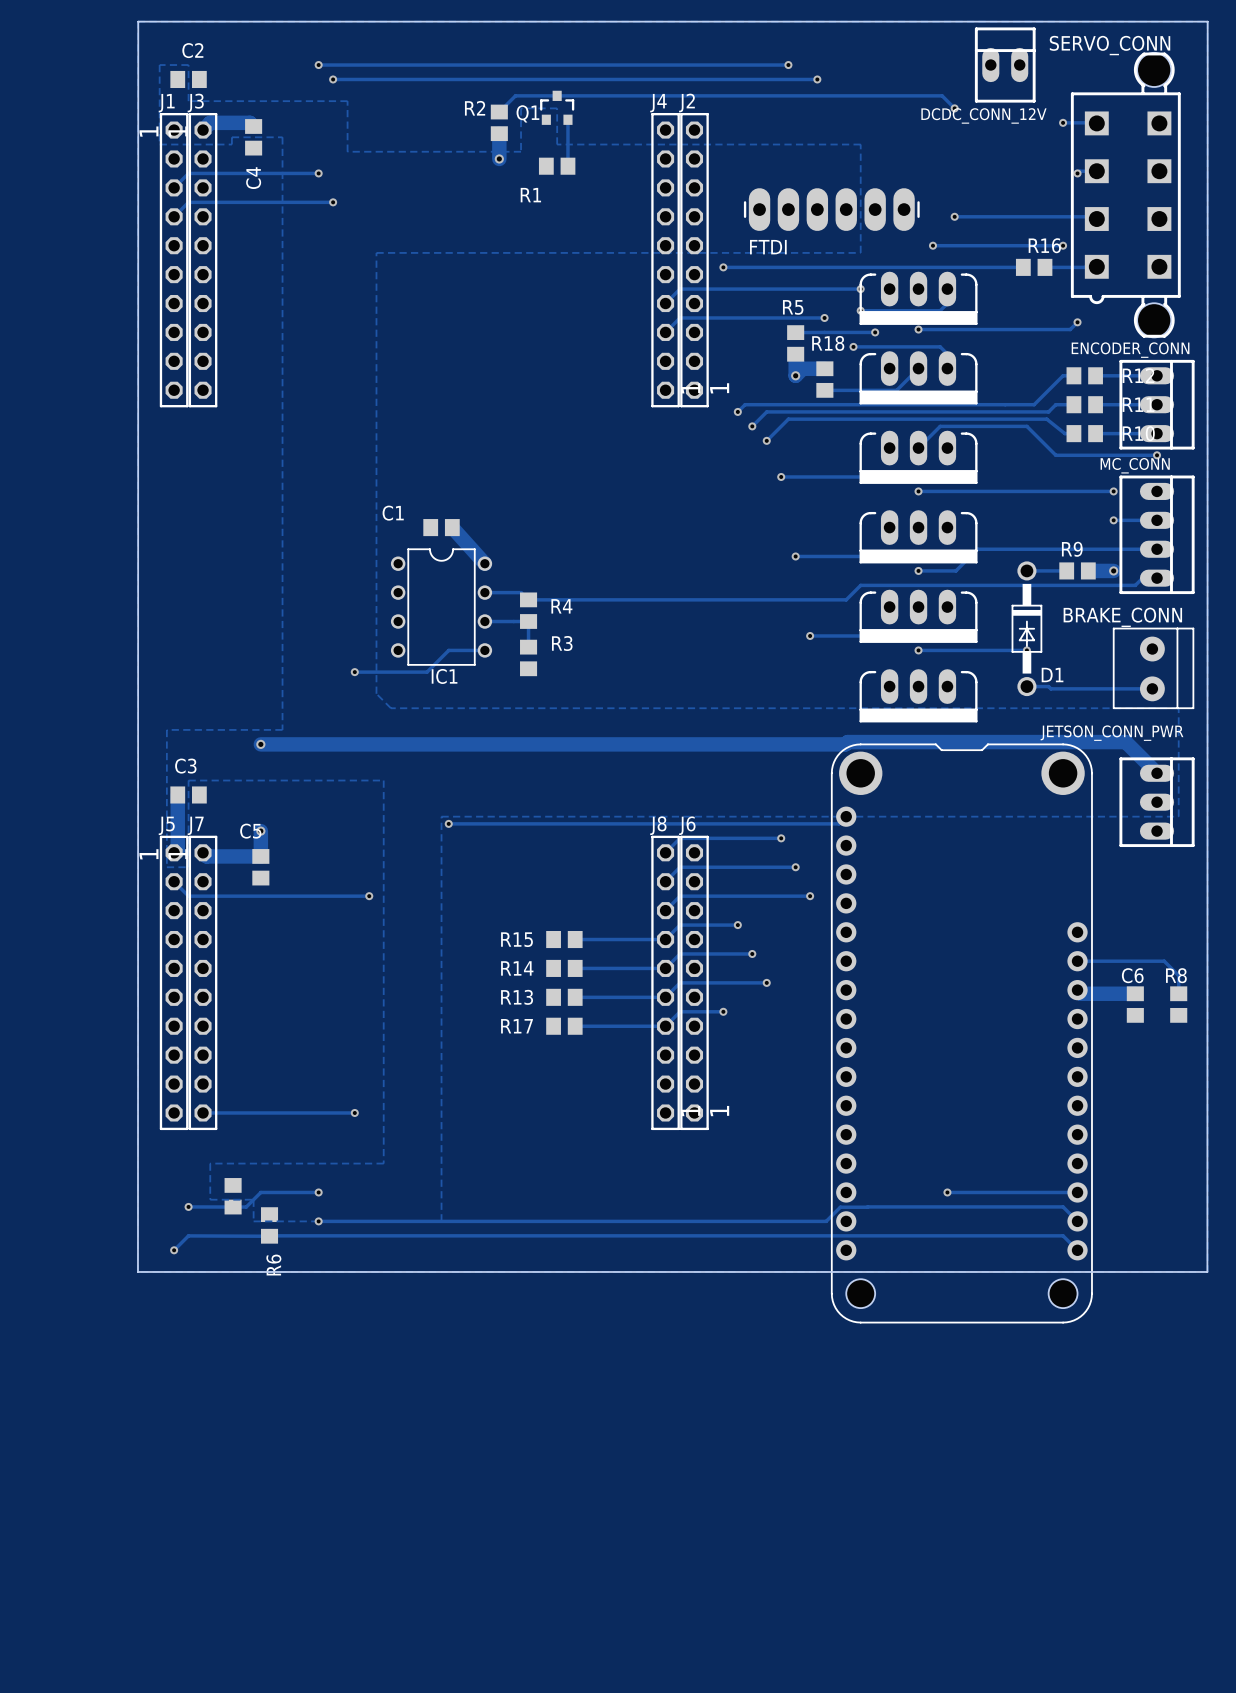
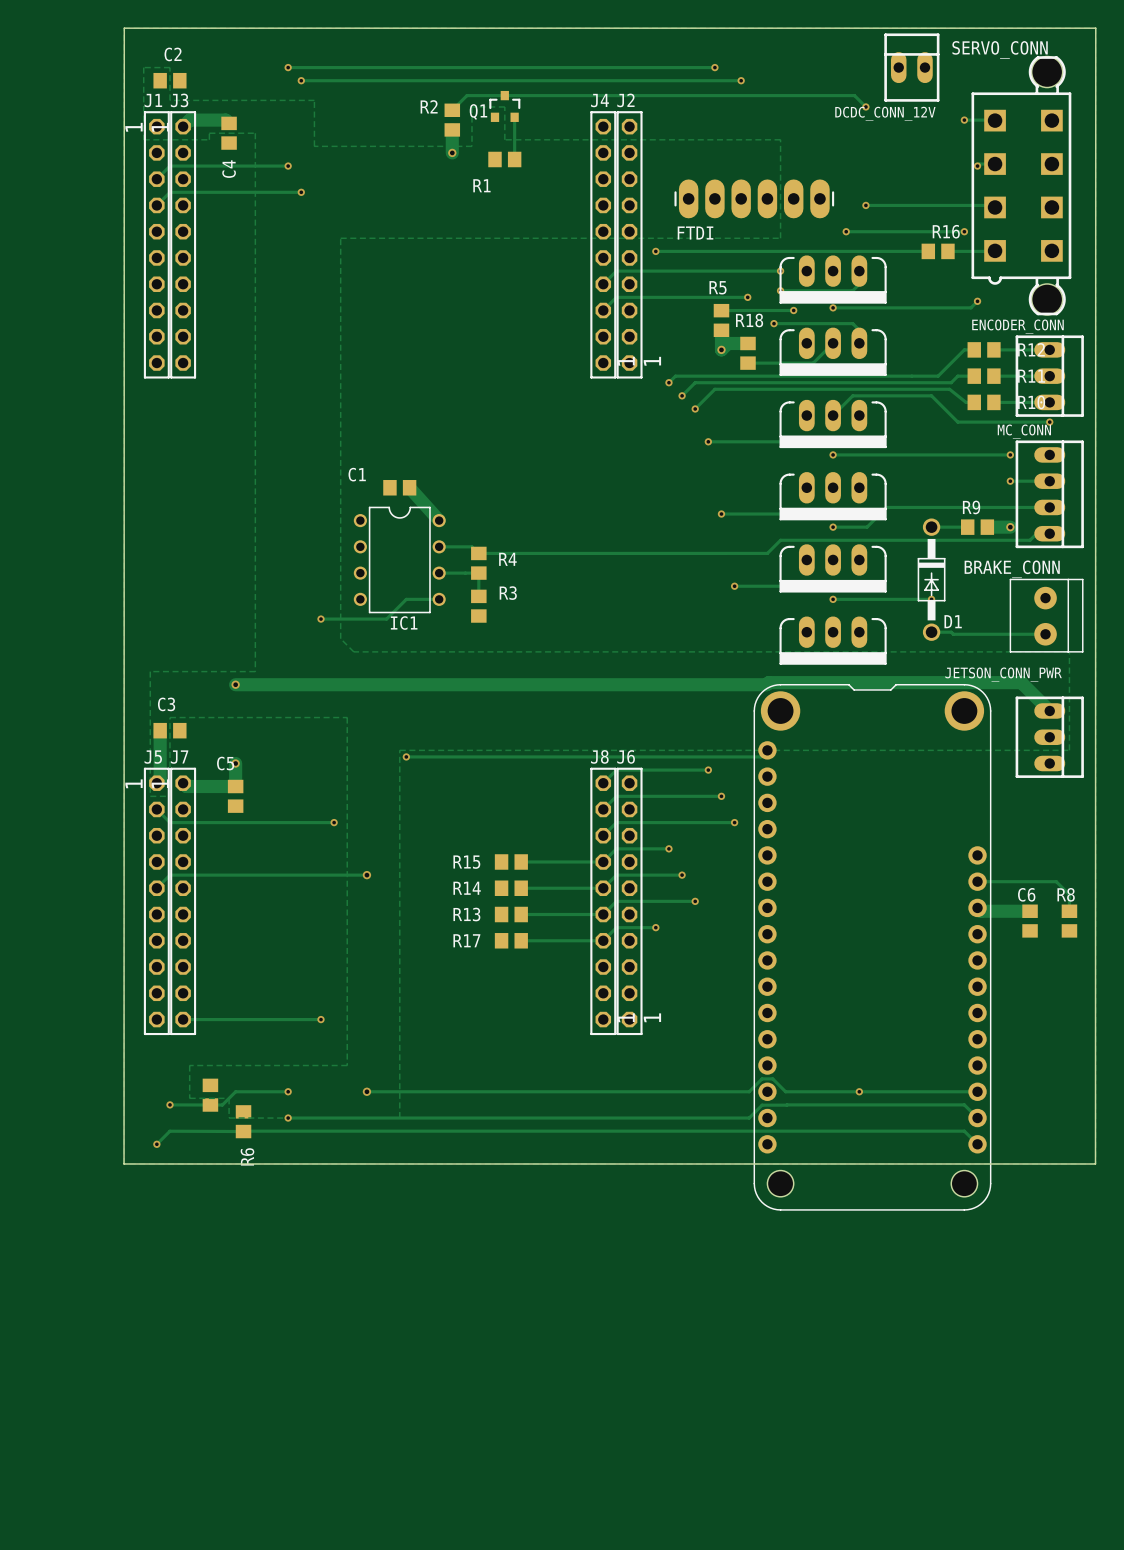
track: none -> (366, 875) (169, 875) (156, 888)
via: none -> (366, 875)
track: none -> (366, 1091) (749, 1091) (762, 1078) (772, 1078) (785, 1091) (859, 1091)
via: none -> (366, 1091)

